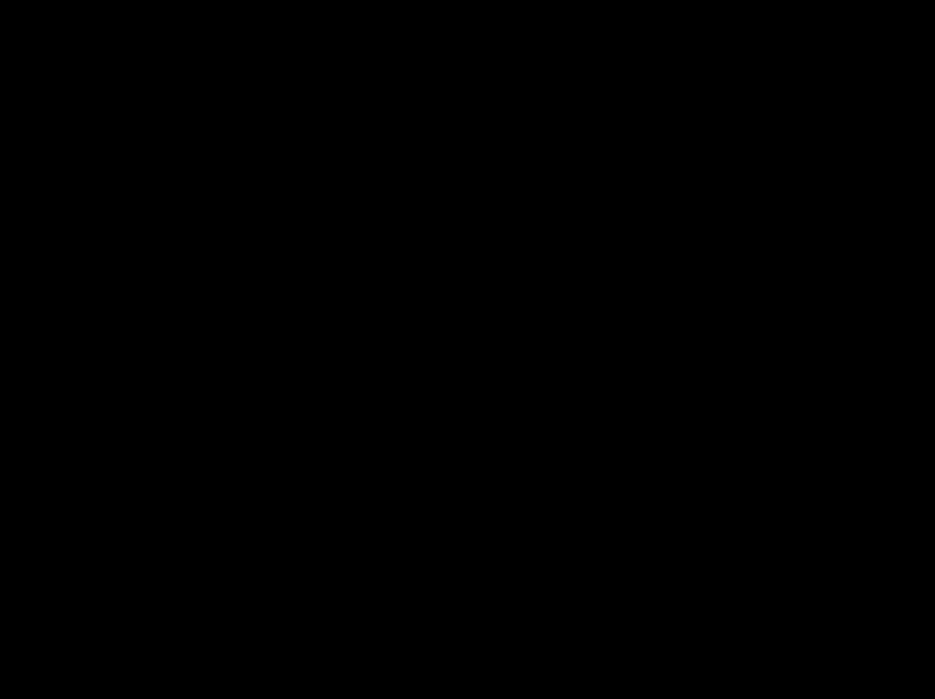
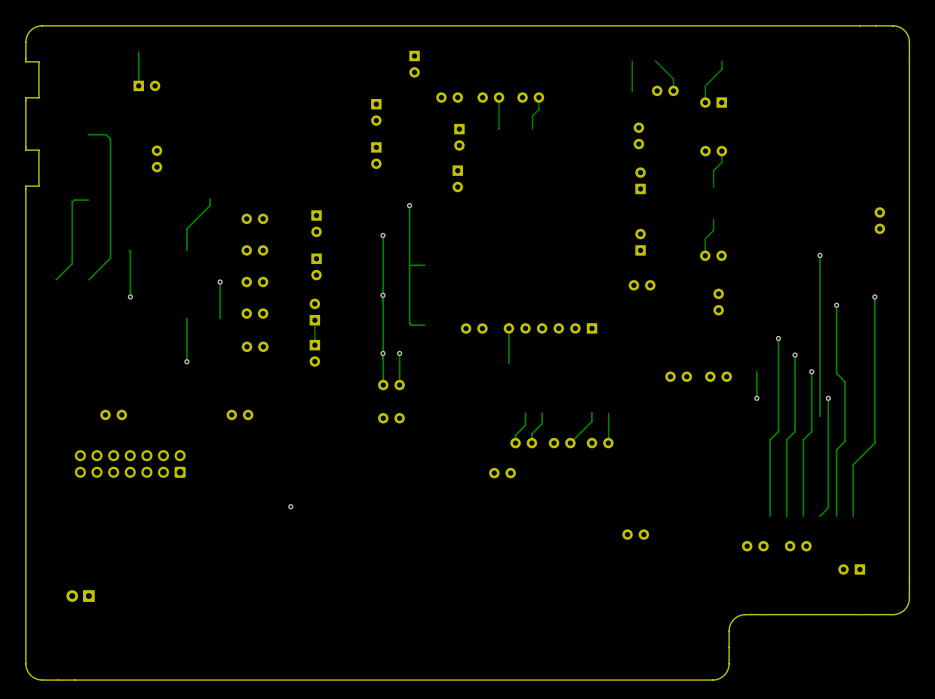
board edge: none -> (893, 25) (42, 25) (32, 29) (25, 40) (25, 61) (38, 61) (38, 97) (25, 97) (25, 150) (38, 150) (38, 186) (25, 186) (25, 663) (29, 673) (34, 677) (42, 680) (714, 679) (722, 676) (727, 669) (729, 626) (732, 621) (739, 615) (893, 614) (903, 611) (908, 604) (909, 598) (909, 42) (904, 30) (893, 25)
track: none -> (138, 52) (138, 85)
track: none -> (632, 60) (632, 91)
track: none -> (655, 60) (673, 79) (673, 90)
track: none -> (721, 60) (721, 69) (705, 85) (705, 102)
part: none -> (414, 64)
part: none -> (146, 85)
part: none -> (665, 90)
part: none -> (449, 97)
part: none -> (490, 97)
track: none -> (499, 97) (499, 129)
part: none -> (530, 97)
track: none -> (538, 97) (538, 109) (532, 115) (532, 129)
part: none -> (713, 102)
part: none -> (376, 112)
track: none -> (88, 134) (106, 134) (110, 139) (110, 258) (88, 279)
part: none -> (638, 135)
part: none -> (459, 137)
part: none -> (713, 151)
track: none -> (721, 151) (721, 162) (713, 170) (713, 187)
part: none -> (376, 155)
part: none -> (157, 158)
part: none -> (457, 178)
part: none -> (640, 180)
track: none -> (210, 198) (210, 205) (186, 228) (186, 250)
track: none -> (88, 200) (74, 200) (72, 202) (72, 263) (56, 279)
track: none -> (409, 205) (409, 323) (424, 325)
via: none -> (409, 205)
part: none -> (254, 218)
track: none -> (713, 219) (713, 230) (705, 238) (705, 255)
part: none -> (879, 220)
part: none -> (316, 223)
track: none -> (382, 235) (383, 385)
via: none -> (382, 235)
part: none -> (640, 242)
track: none -> (129, 250) (130, 296)
part: none -> (254, 250)
part: none -> (713, 255)
track: none -> (820, 255) (820, 416)
via: none -> (820, 255)
track: none -> (424, 265) (409, 265)
part: none -> (316, 266)
track: none -> (220, 282) (220, 318)
via: none -> (220, 282)
part: none -> (254, 282)
part: none -> (642, 285)
via: none -> (382, 295)
via: none -> (130, 296)
track: none -> (874, 296) (874, 443) (853, 464) (853, 516)
via: none -> (874, 296)
part: none -> (718, 302)
track: none -> (836, 305) (836, 373) (844, 381) (844, 441) (836, 449) (836, 516)
via: none -> (836, 305)
part: none -> (314, 312)
part: none -> (254, 313)
track: none -> (186, 318) (186, 361)
track: none -> (314, 320) (314, 345)
part: none -> (474, 328)
track: none -> (508, 328) (508, 363)
part: none -> (550, 328)
track: none -> (778, 338) (778, 431) (770, 439) (770, 516)
via: none -> (778, 338)
part: none -> (255, 346)
part: none -> (314, 353)
via: none -> (382, 353)
track: none -> (399, 353) (399, 385)
via: none -> (399, 353)
track: none -> (795, 355) (795, 431) (786, 439) (786, 516)
via: none -> (795, 355)
via: none -> (186, 361)
track: none -> (756, 371) (756, 398)
track: none -> (811, 371) (811, 431) (803, 439) (803, 516)
via: none -> (811, 371)
part: none -> (678, 376)
part: none -> (718, 376)
part: none -> (391, 385)
via: none -> (756, 398)
track: none -> (828, 398) (828, 507) (820, 516)
via: none -> (828, 398)
track: none -> (525, 413) (525, 425) (515, 435) (515, 443)
track: none -> (542, 413) (542, 423) (531, 433) (531, 443)
track: none -> (592, 413) (591, 421) (570, 443)
track: none -> (608, 413) (608, 443)
part: none -> (113, 414)
part: none -> (239, 414)
part: none -> (391, 418)
part: none -> (523, 443)
part: none -> (562, 443)
part: none -> (600, 443)
part: none -> (130, 463)
part: none -> (502, 473)
via: none -> (290, 506)
part: none -> (635, 534)
part: none -> (755, 546)
part: none -> (798, 546)
part: none -> (851, 569)
part: none -> (80, 596)

